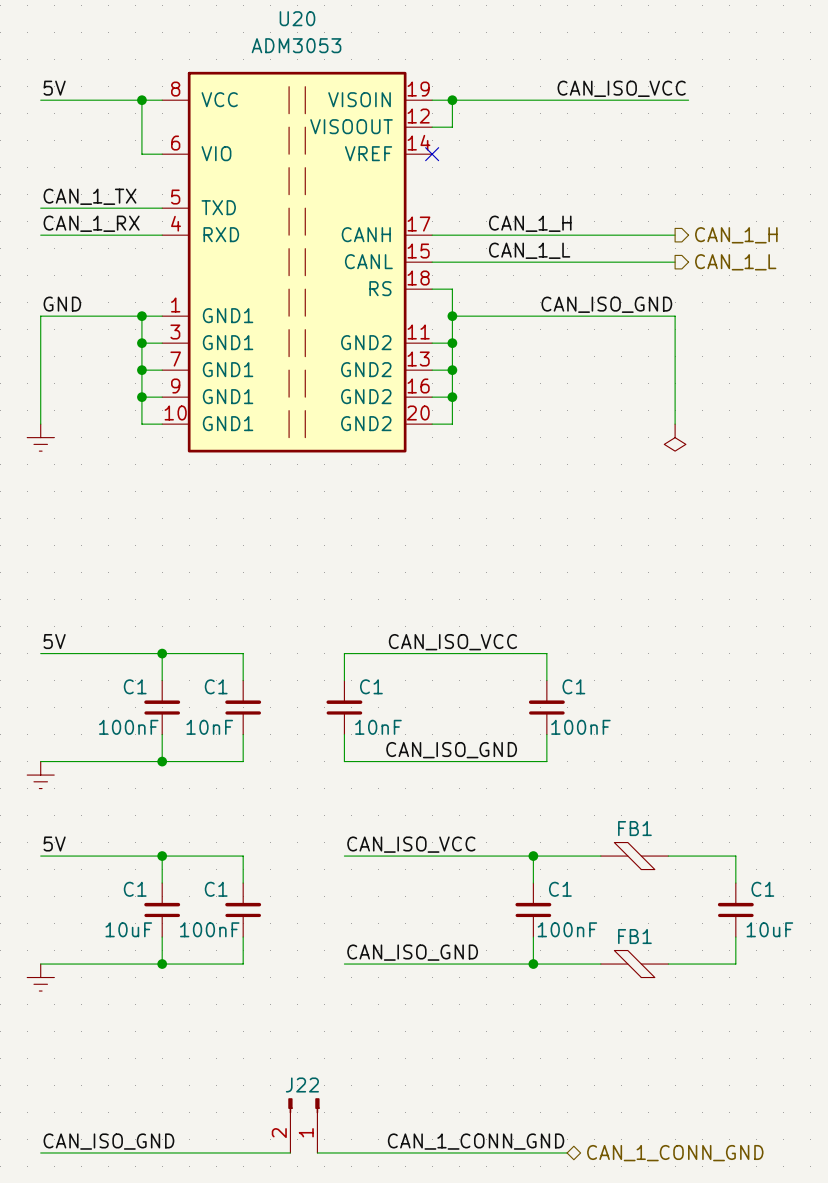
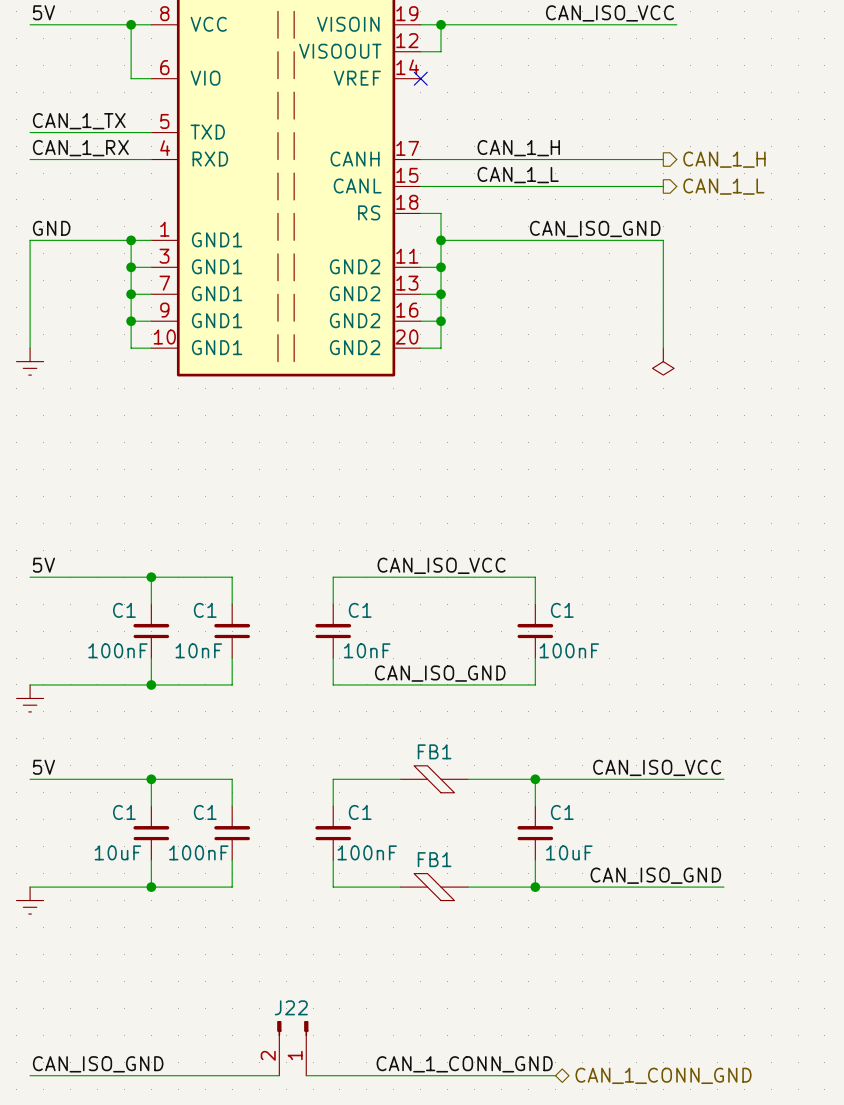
label: CAN_ISO_VCC (411, 844) -> none
label: none -> CAN_ISO_VCC (657, 767)
FB1: none -> (434, 779)
wire: (533, 856) (533, 883) -> (333, 779) (333, 806)
junction position: (533, 856) -> (535, 779)
FB1: (634, 856) -> none
wire: (735, 856) (735, 883) -> (535, 779) (535, 806)
C1 position: (533, 910) -> (333, 833)
C1 position: (735, 910) -> (535, 833)
wire: (533, 937) (533, 964) -> (333, 860) (333, 887)
wire: (735, 937) (735, 964) -> (535, 860) (535, 887)
label: CAN_ISO_GND (412, 952) -> none
label: none -> CAN_ISO_GND (655, 875)
FB1: none -> (434, 887)
junction position: (533, 964) -> (535, 887)
FB1: (634, 964) -> none

